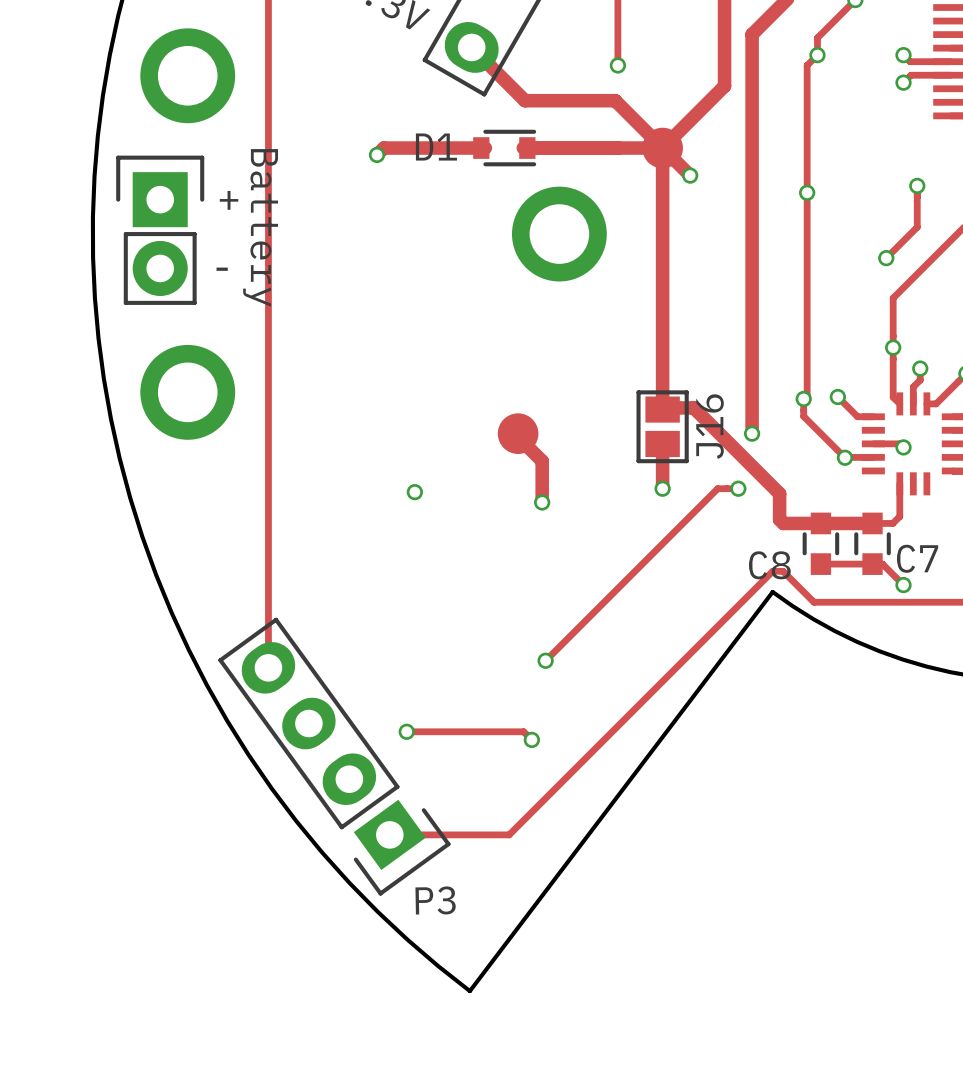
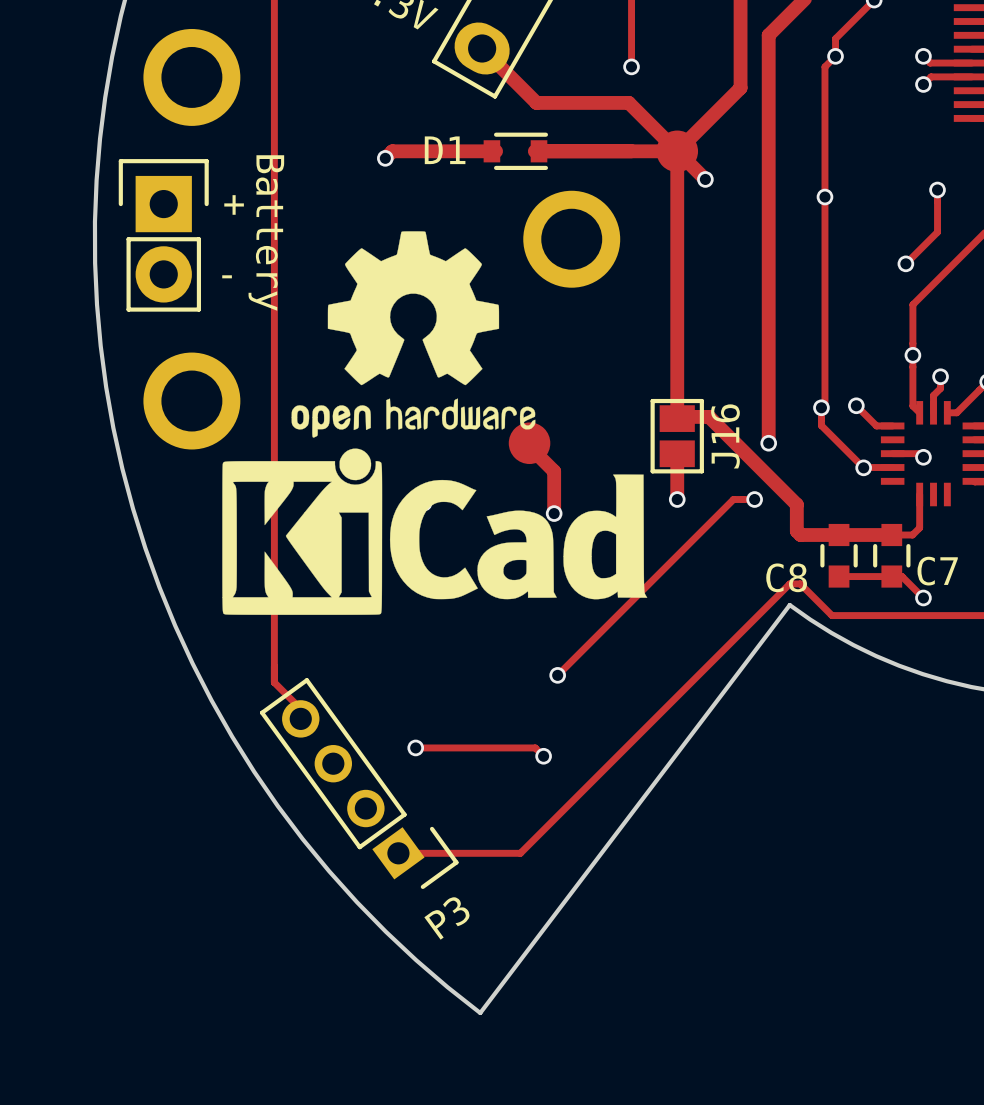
drawing: none -> [222, 231, 648, 615]
P3 footprint: [218, 617, 451, 896] -> [260, 678, 459, 890]
track: none -> (274, 682) (300, 709) (300, 718)

